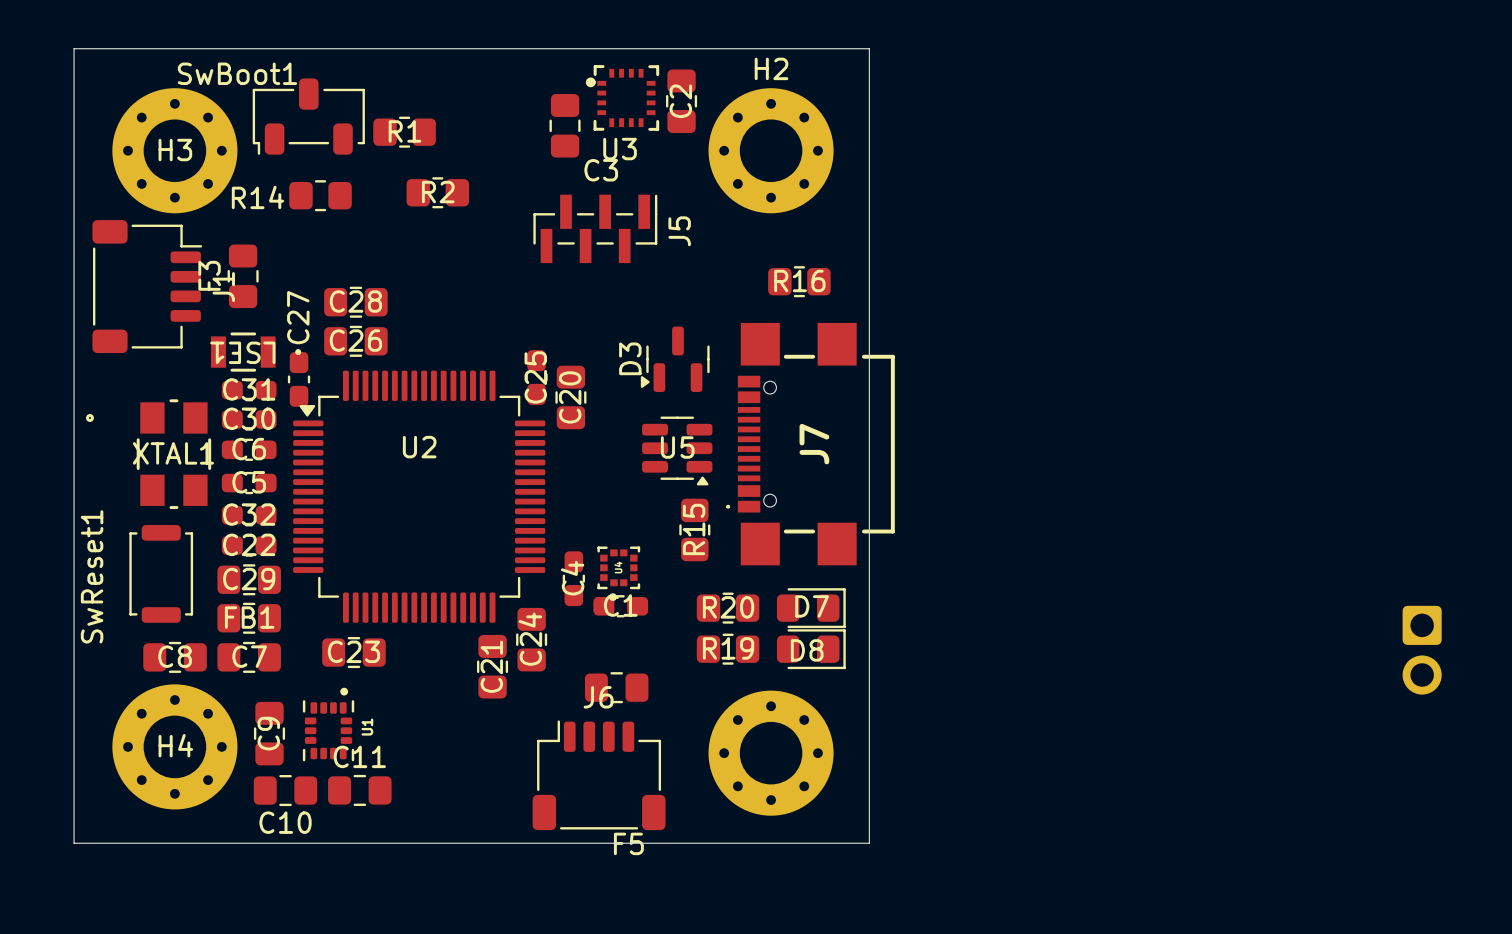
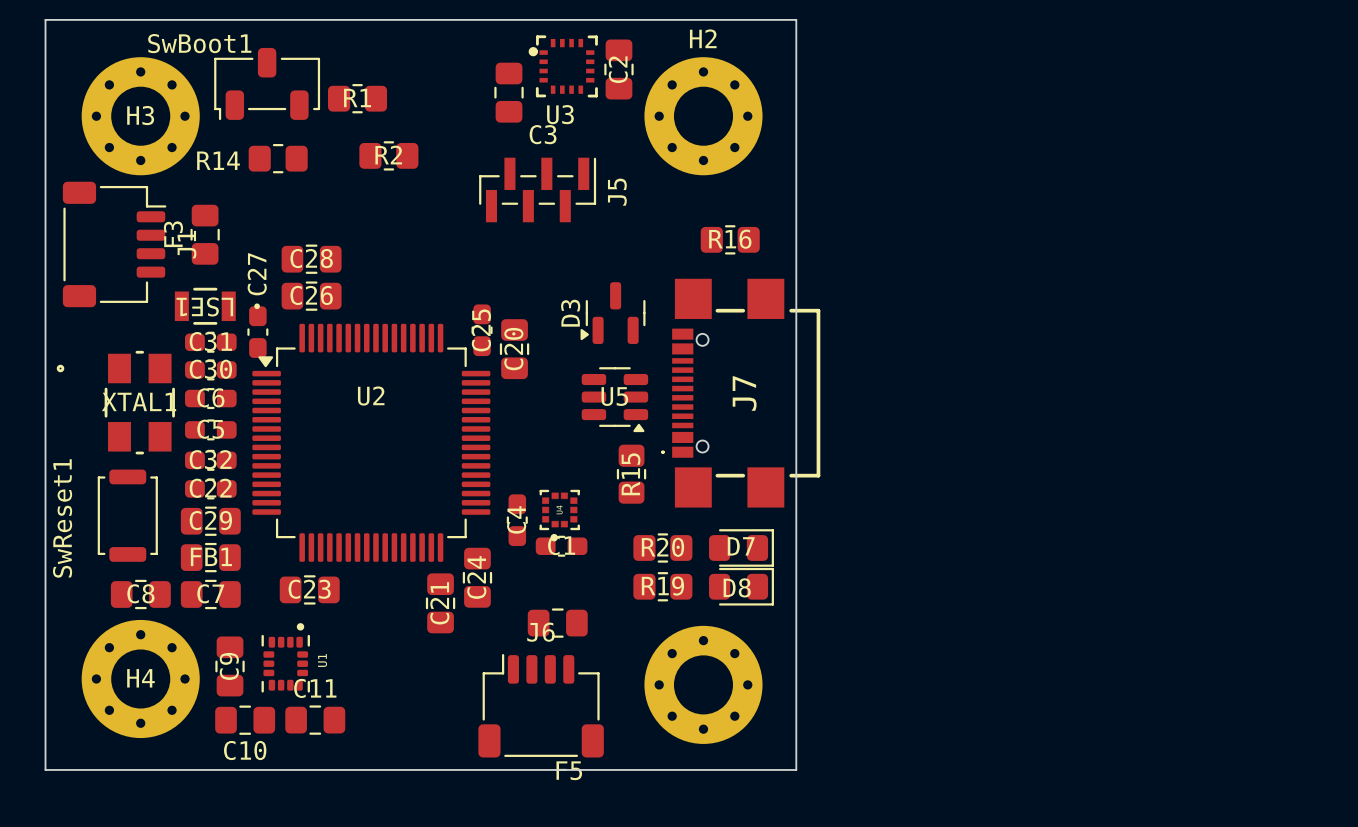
part: (1422, 650) -> none

